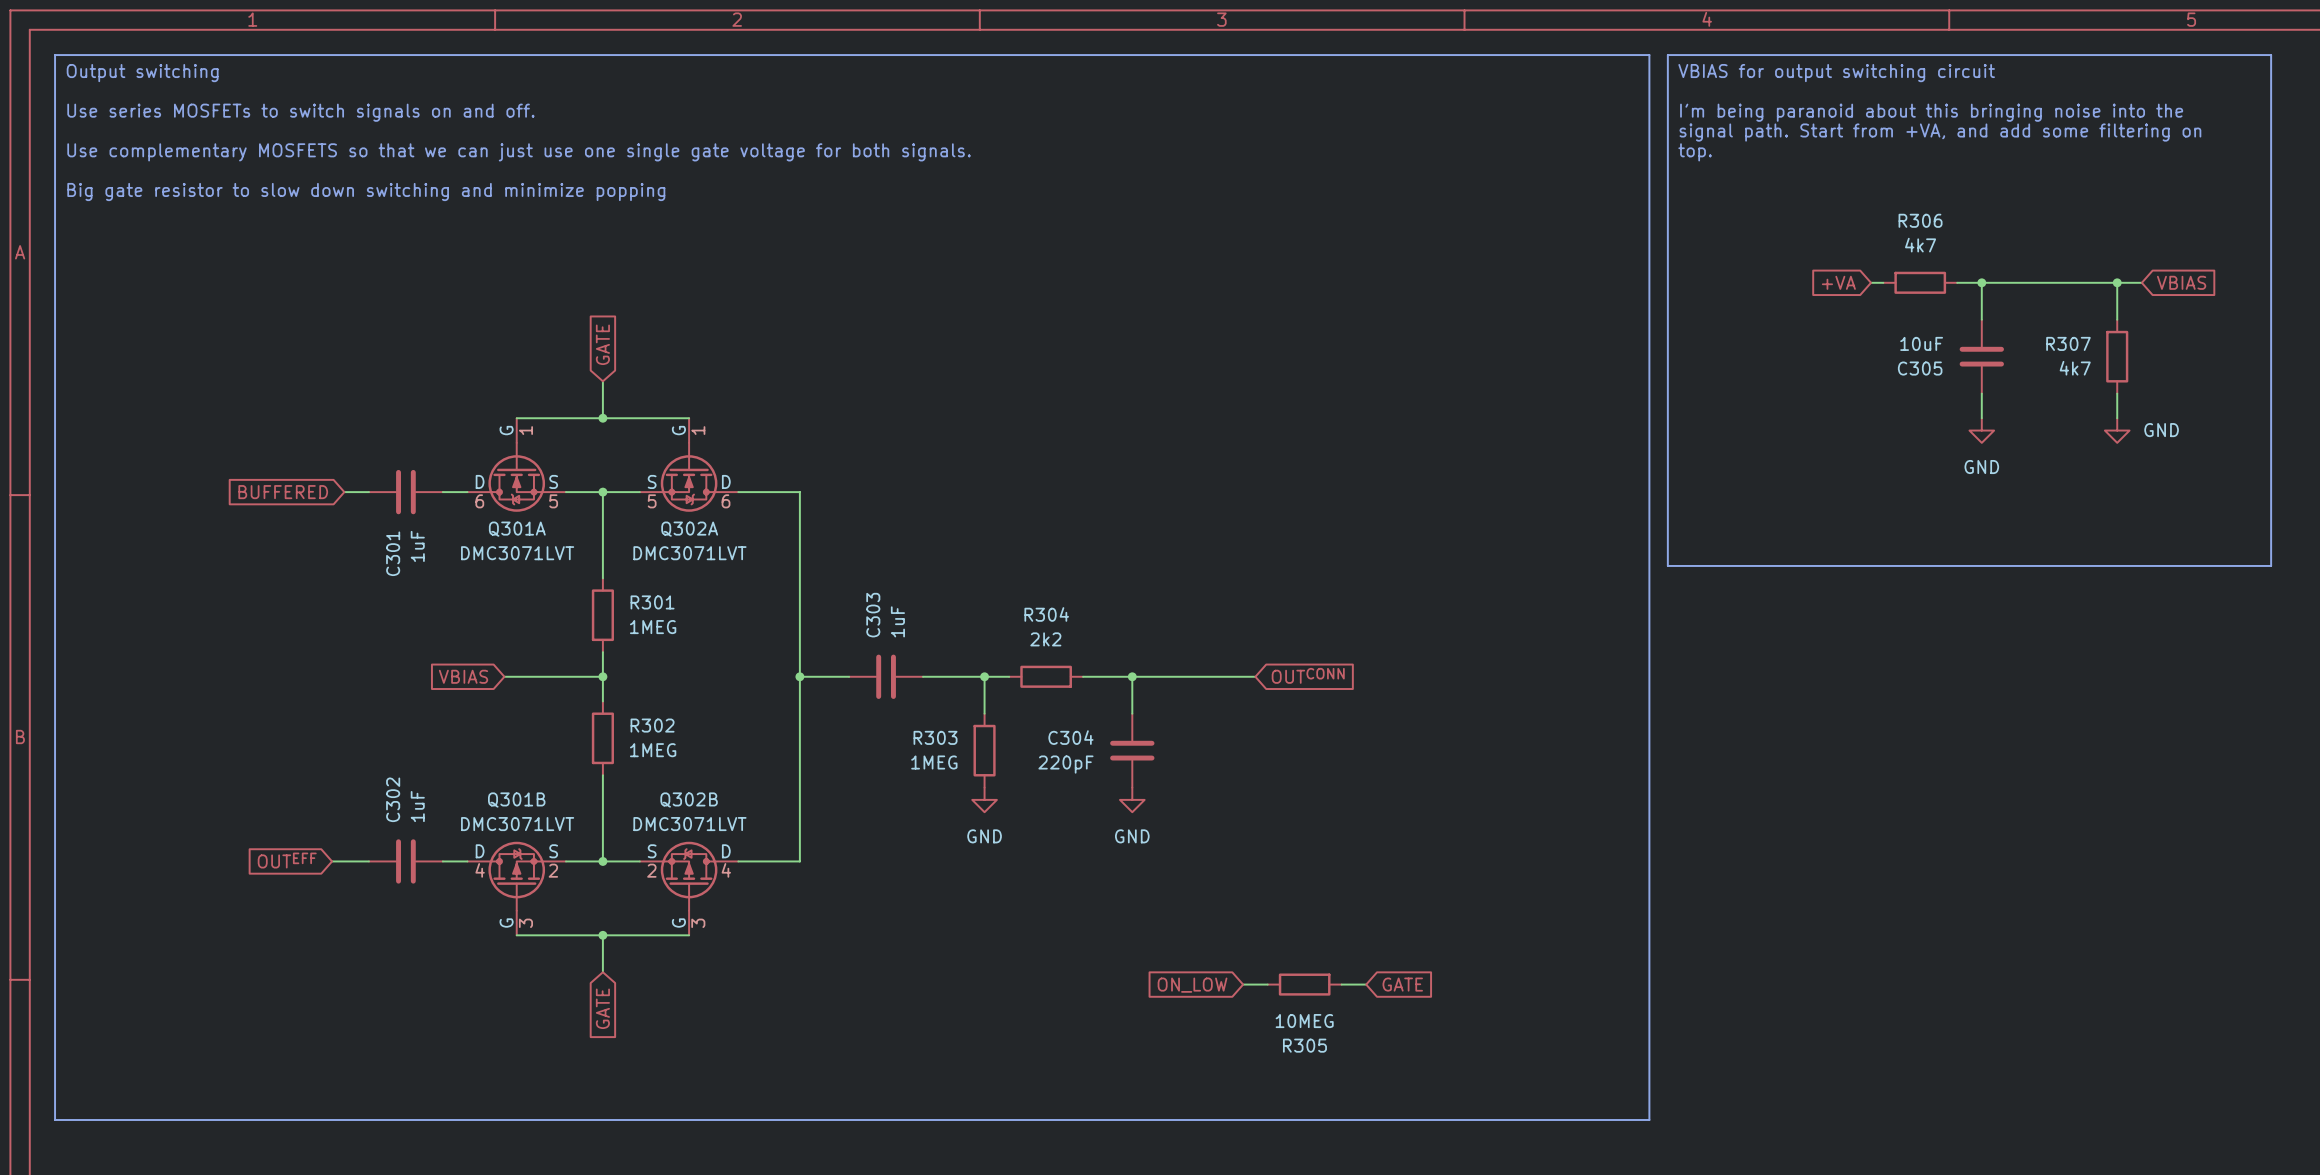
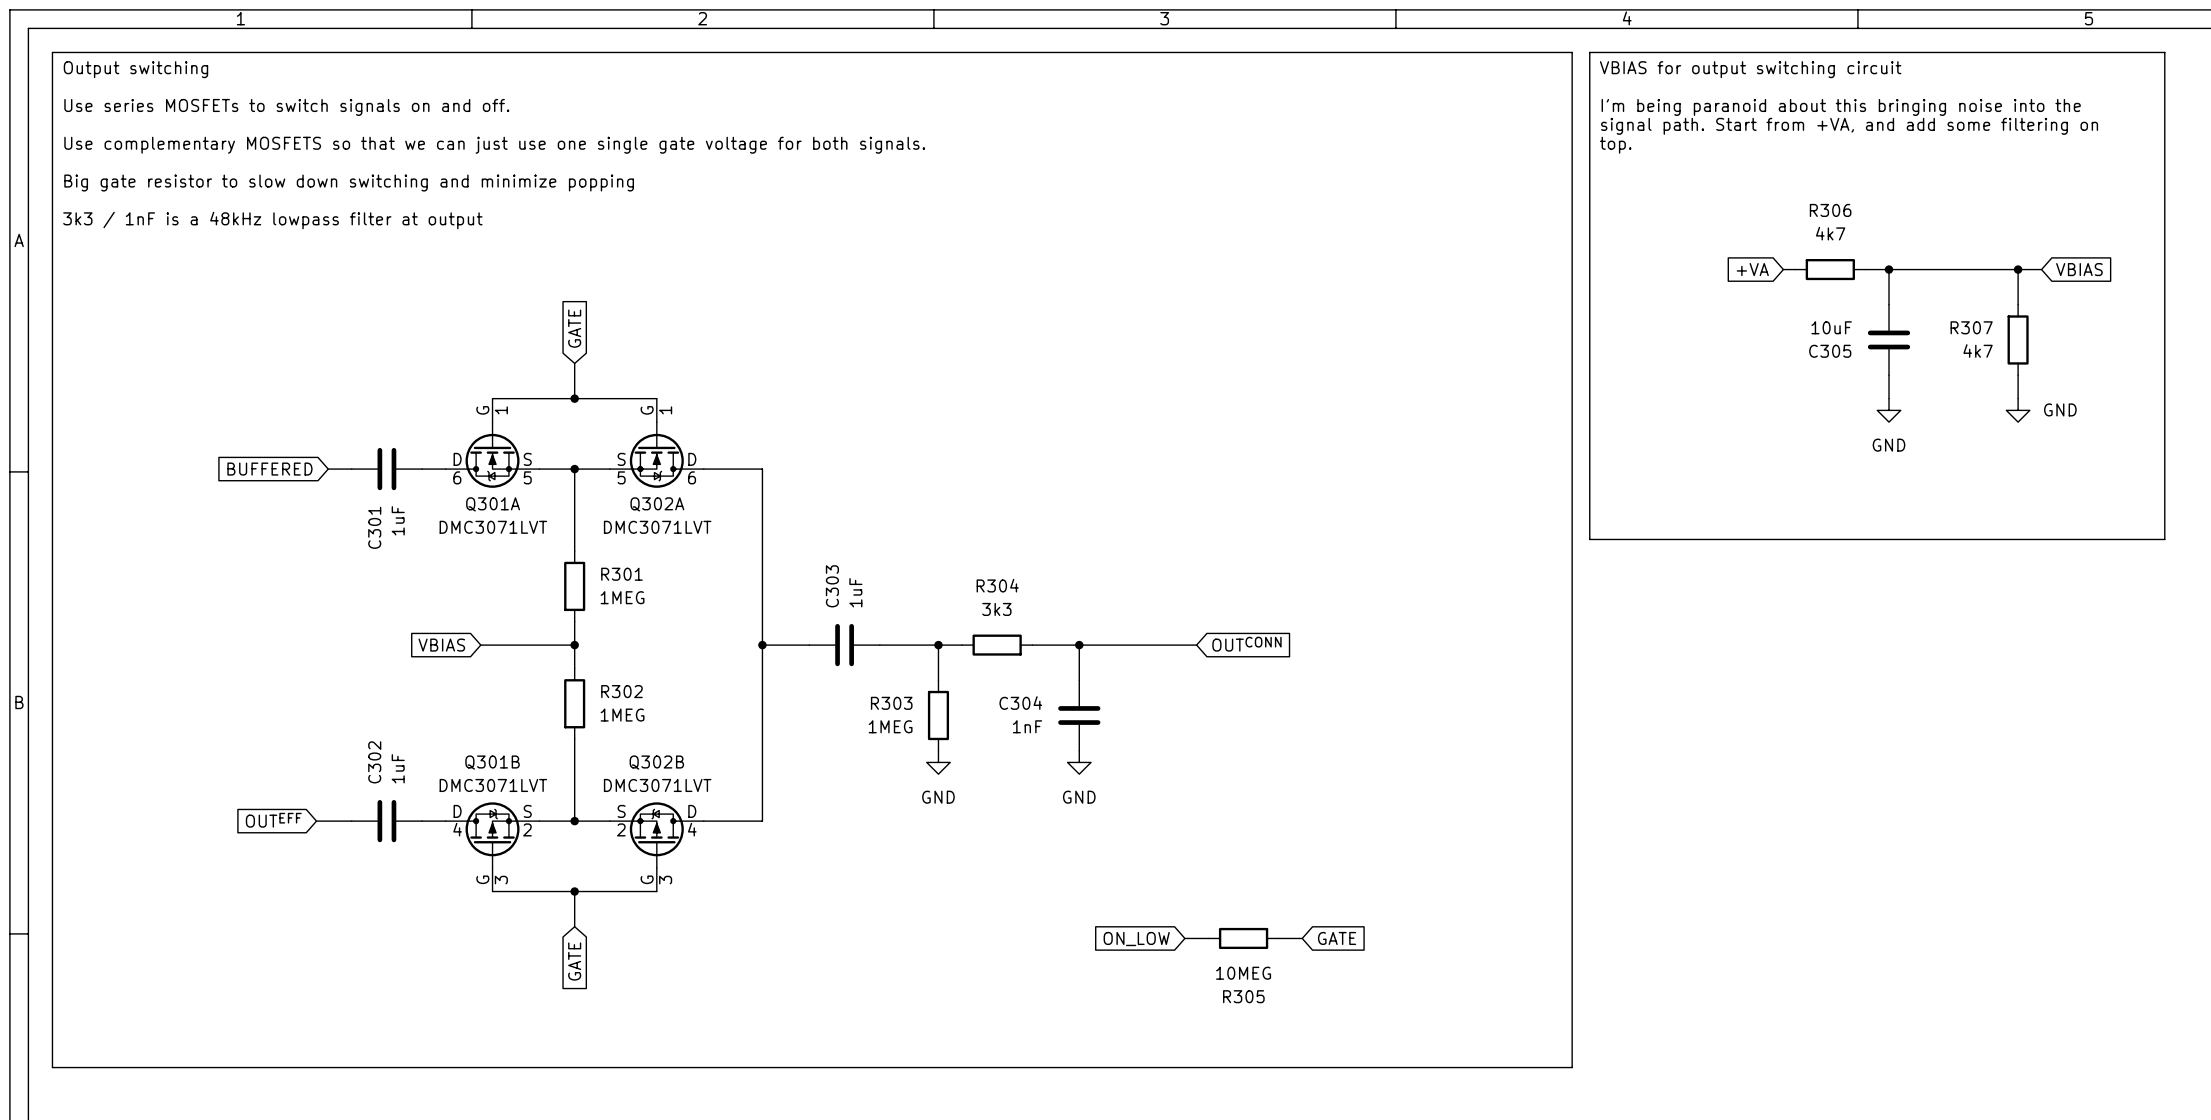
text: none -> 3k3 / 1nF is a 48kHz lowpass filter at output (272, 220)
R304 value: 2k2 (1045, 639) -> 3k3 (996, 609)
C304 value: 220pF (1065, 764) -> 1nF (1027, 726)

